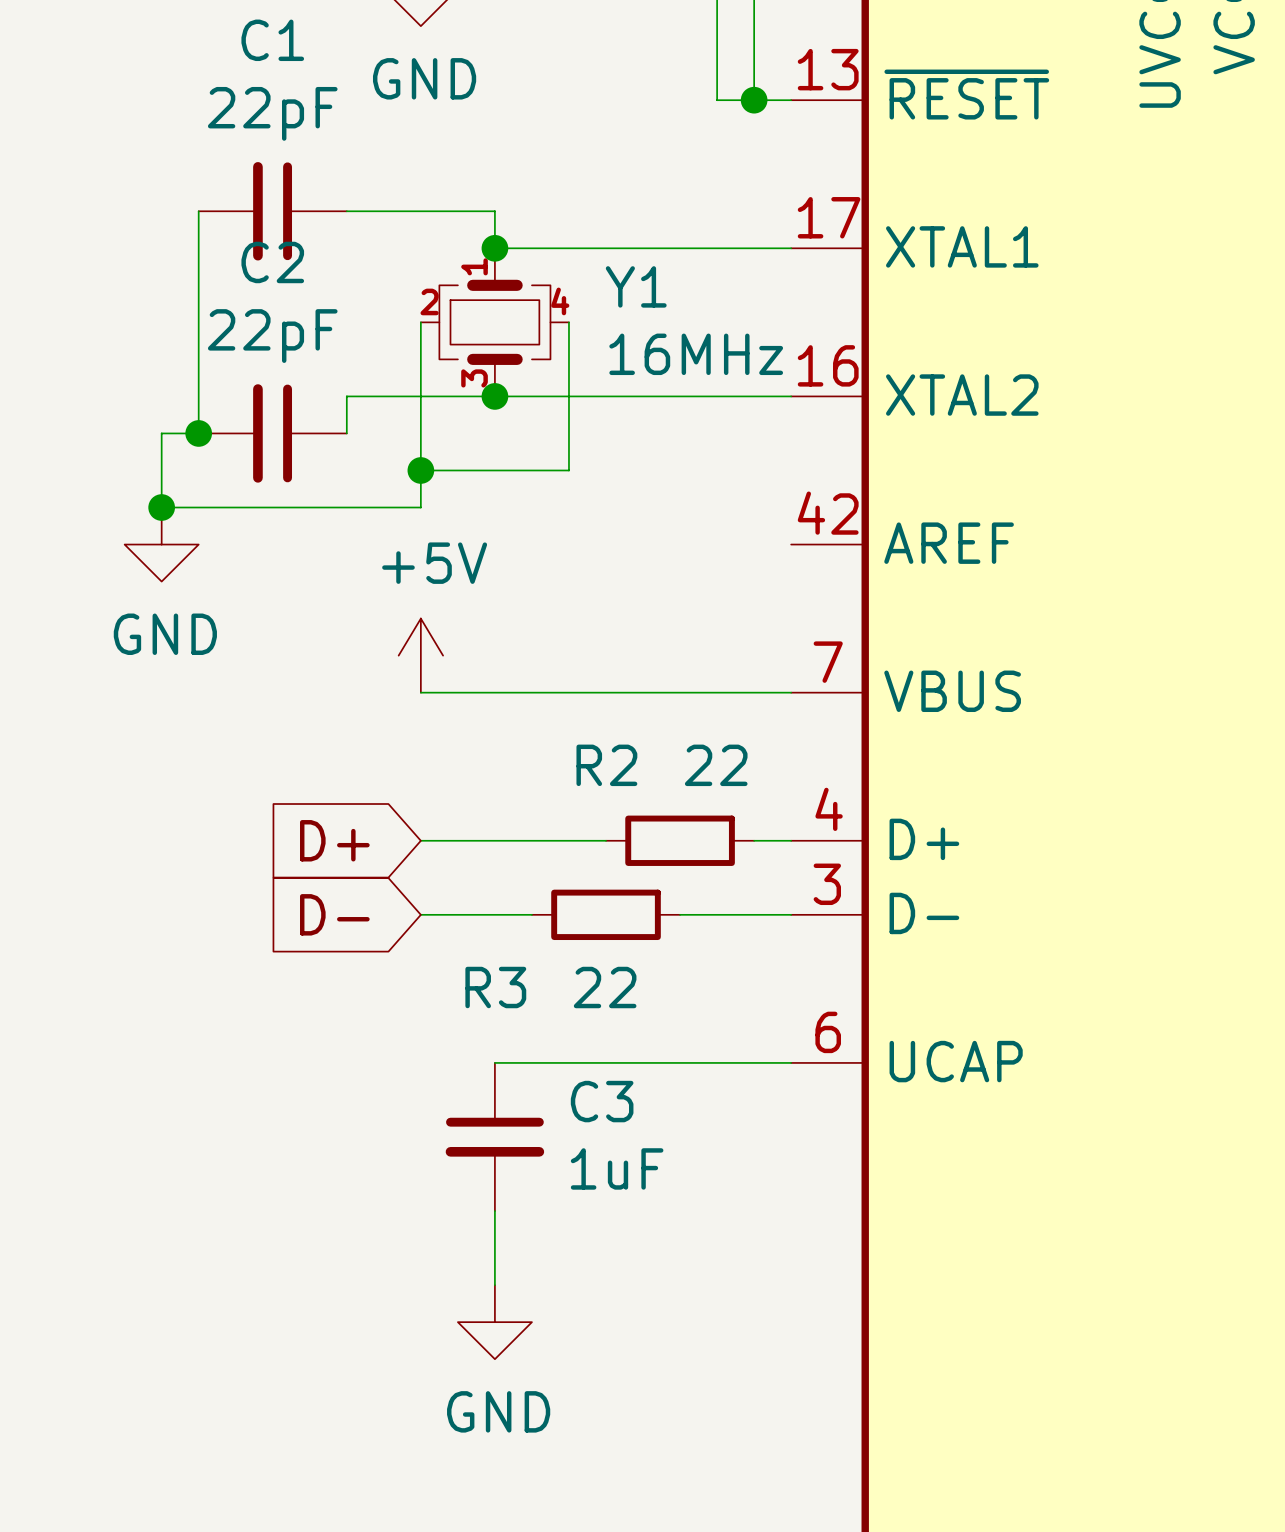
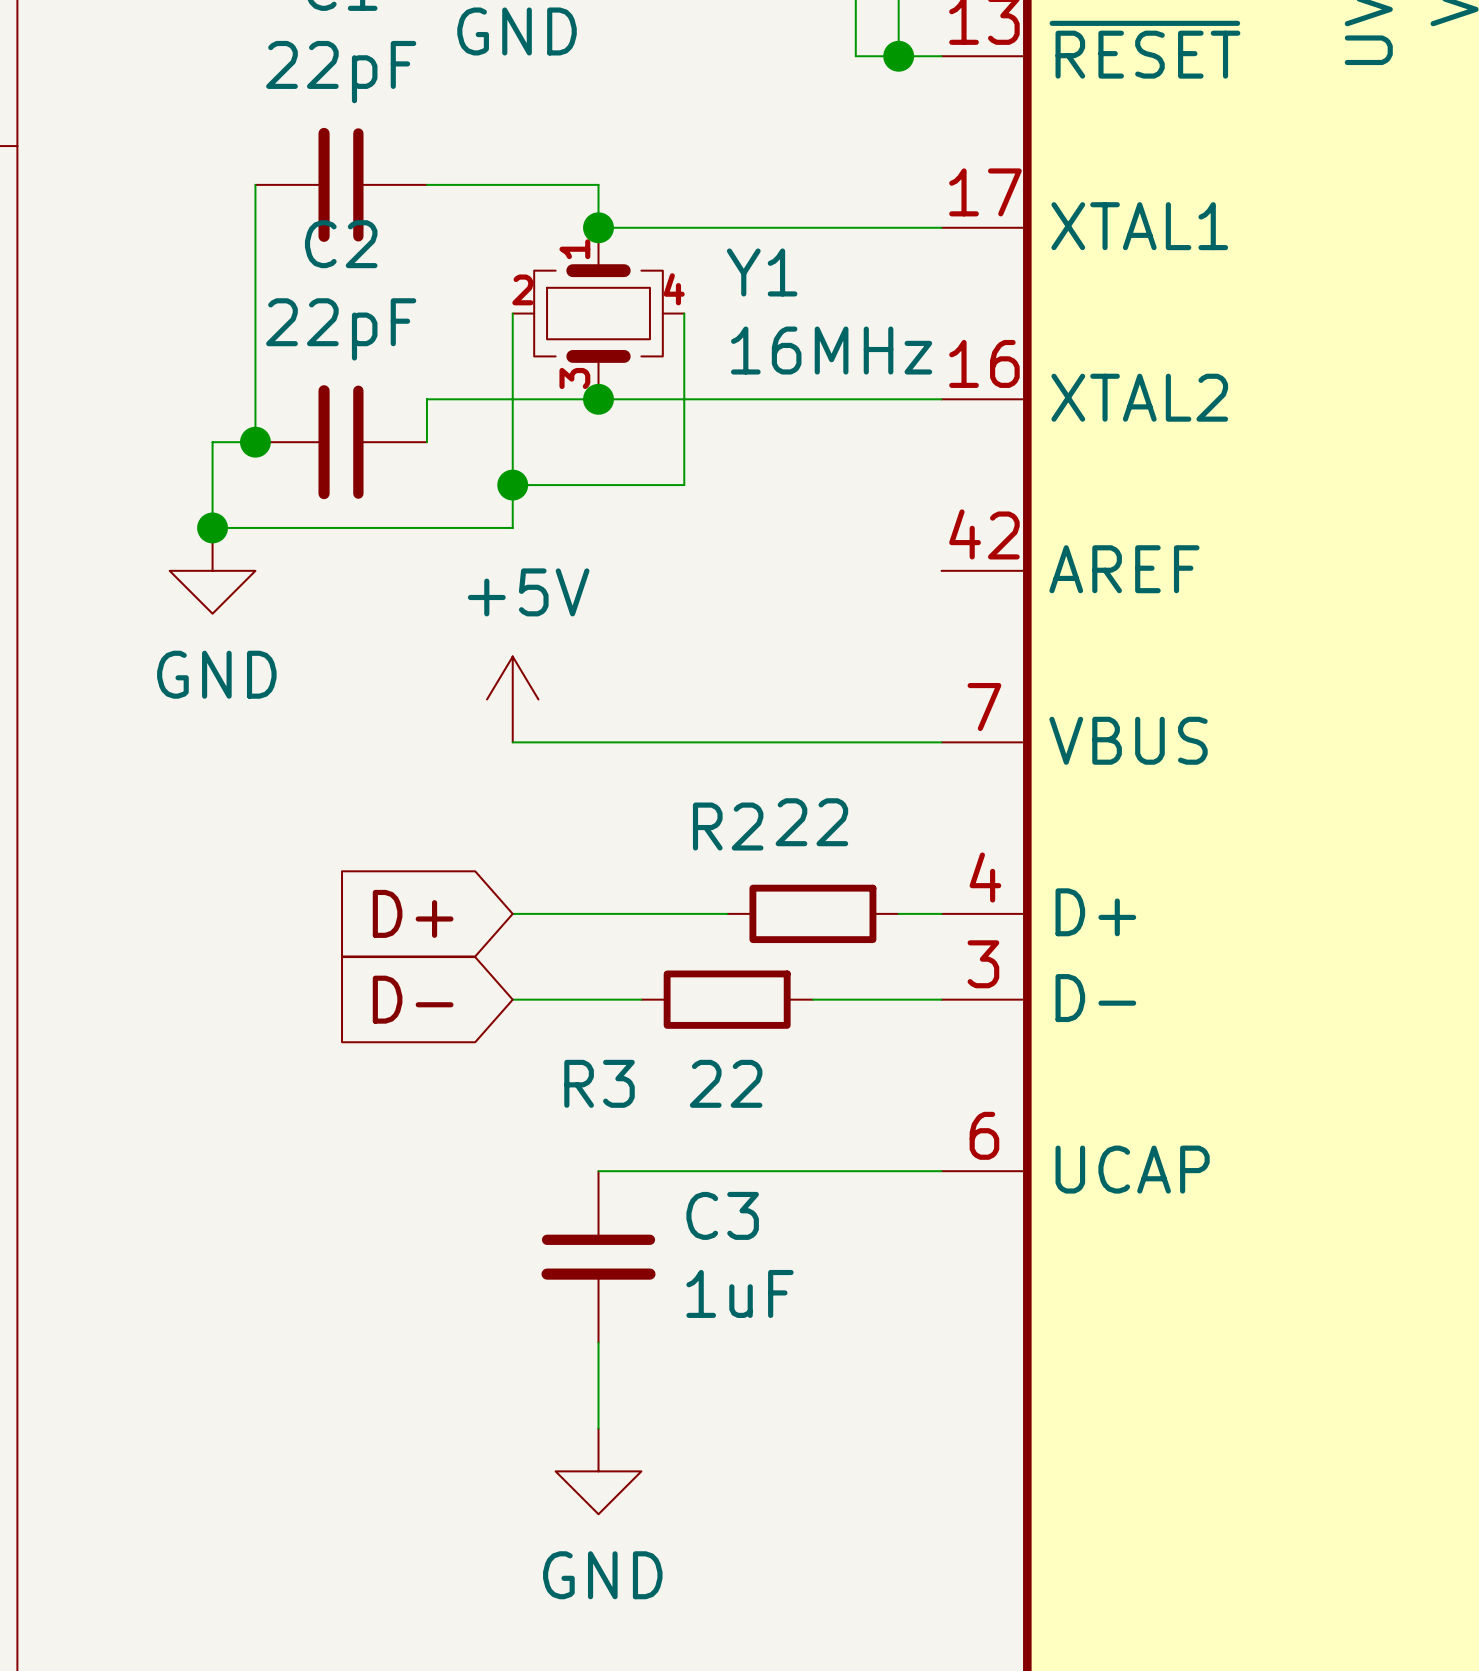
R2 value position: 22 (716, 765) -> 22 (811, 822)

